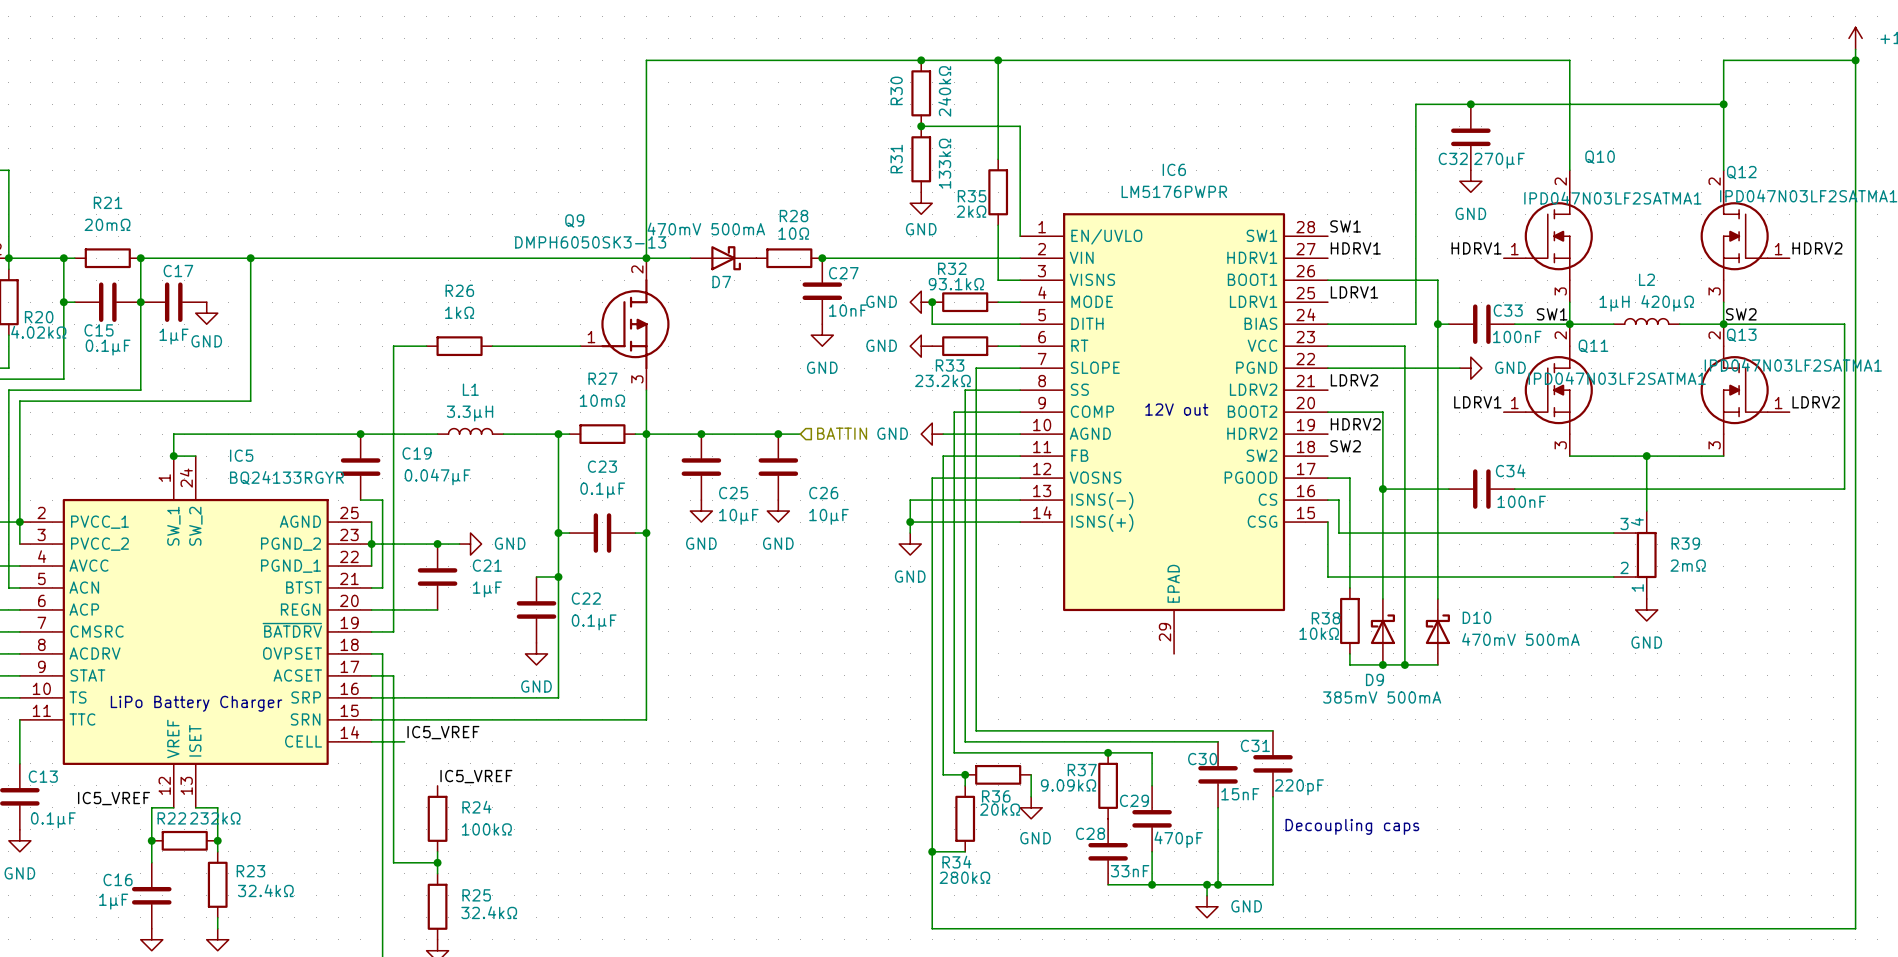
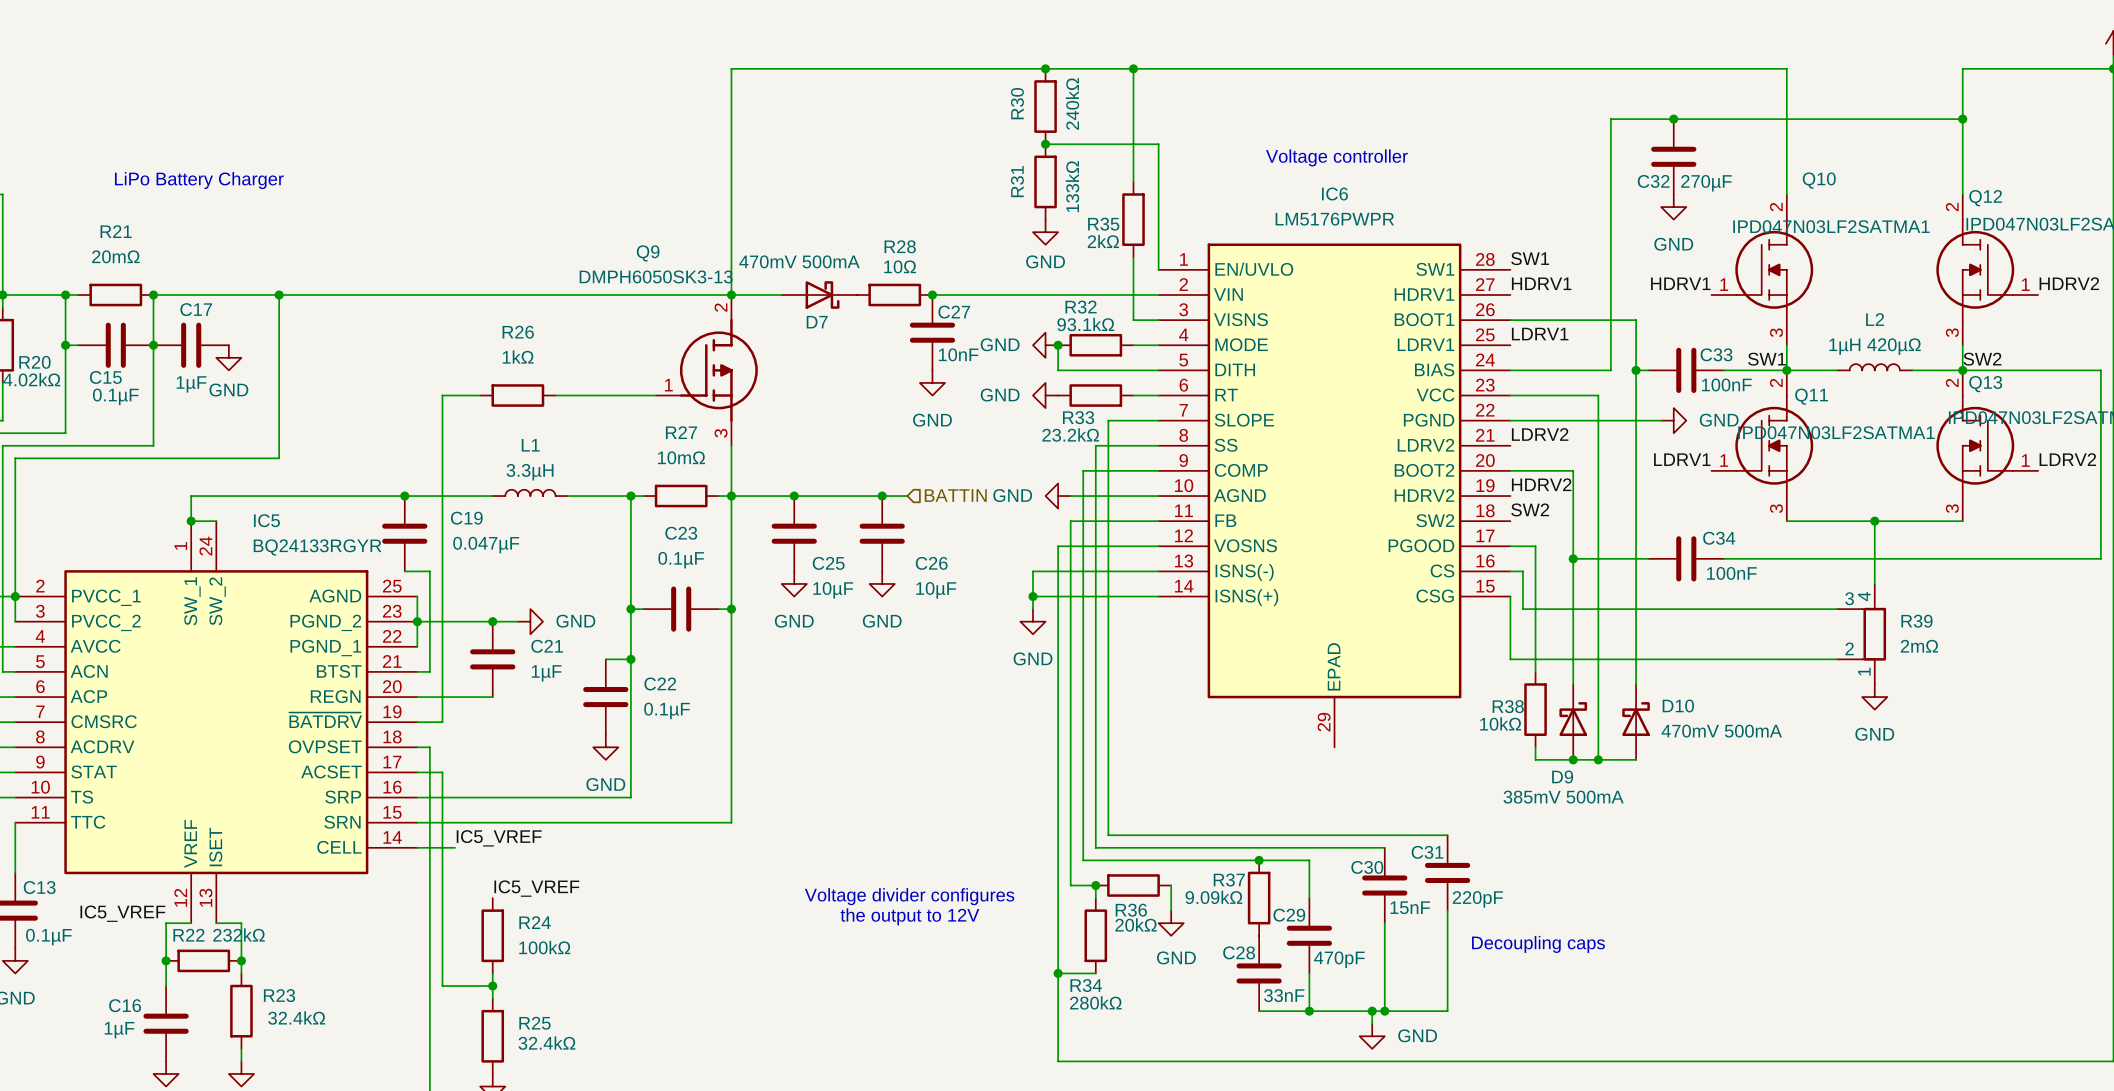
text: none -> Voltage controller (1336, 157)
text: none -> LiPo Battery Charger (199, 180)
text: 12V out (1176, 409) -> none
text: LiPo Battery Charger (196, 703) -> none
text: none -> Voltage divider configures (909, 896)
text: none -> the output to 12V (909, 916)

